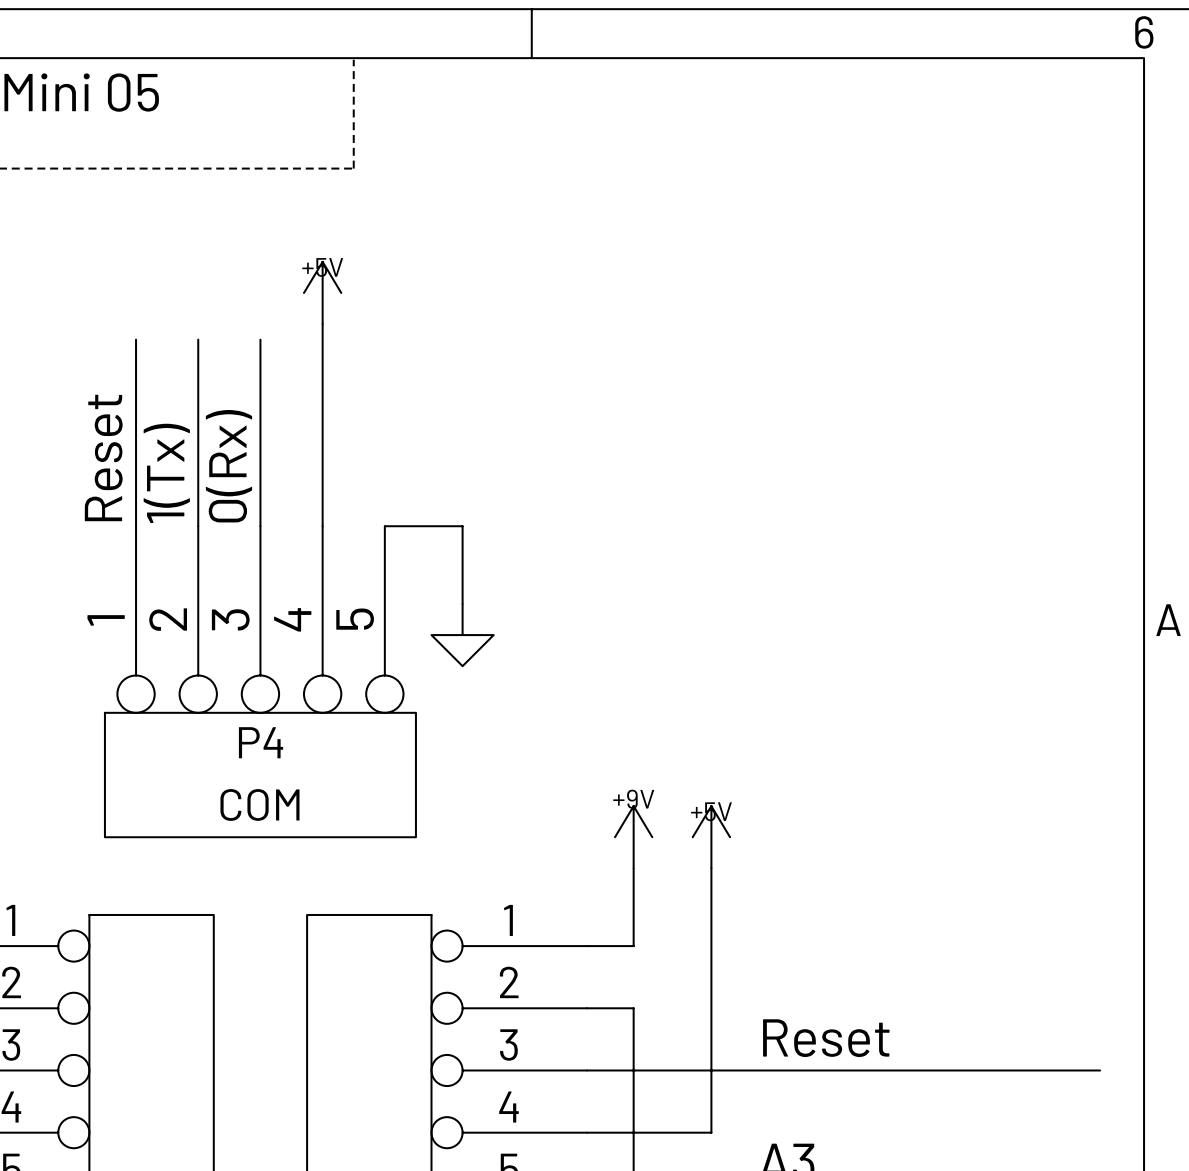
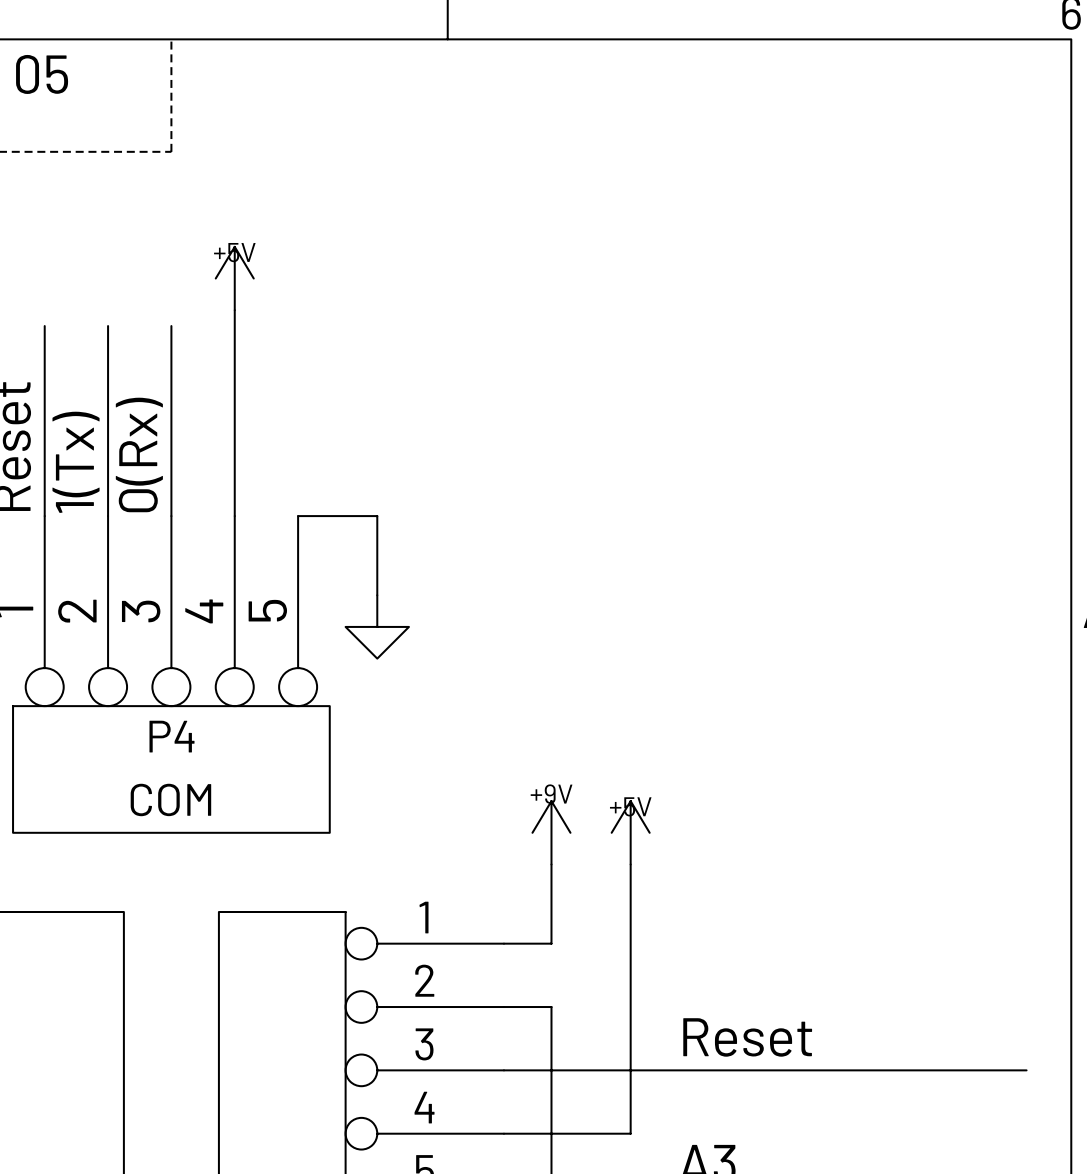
line: (353, 59) (353, 168) (260, 168) -> (171, 40) (171, 151)

